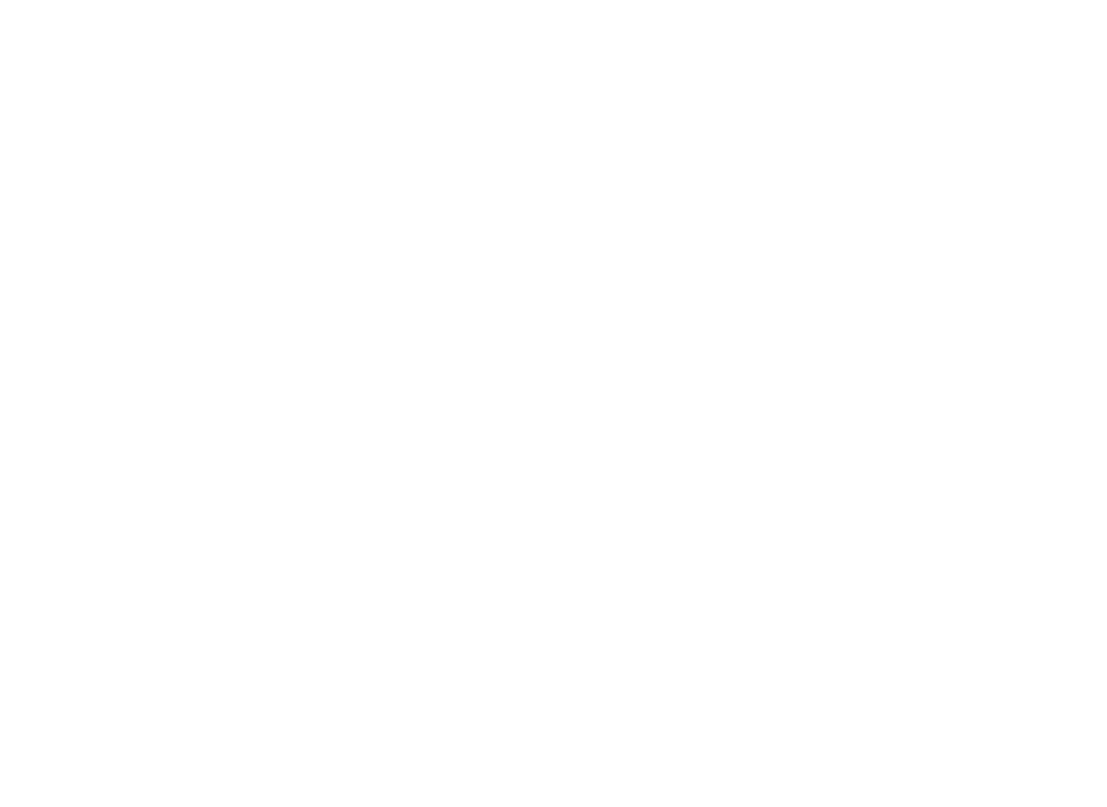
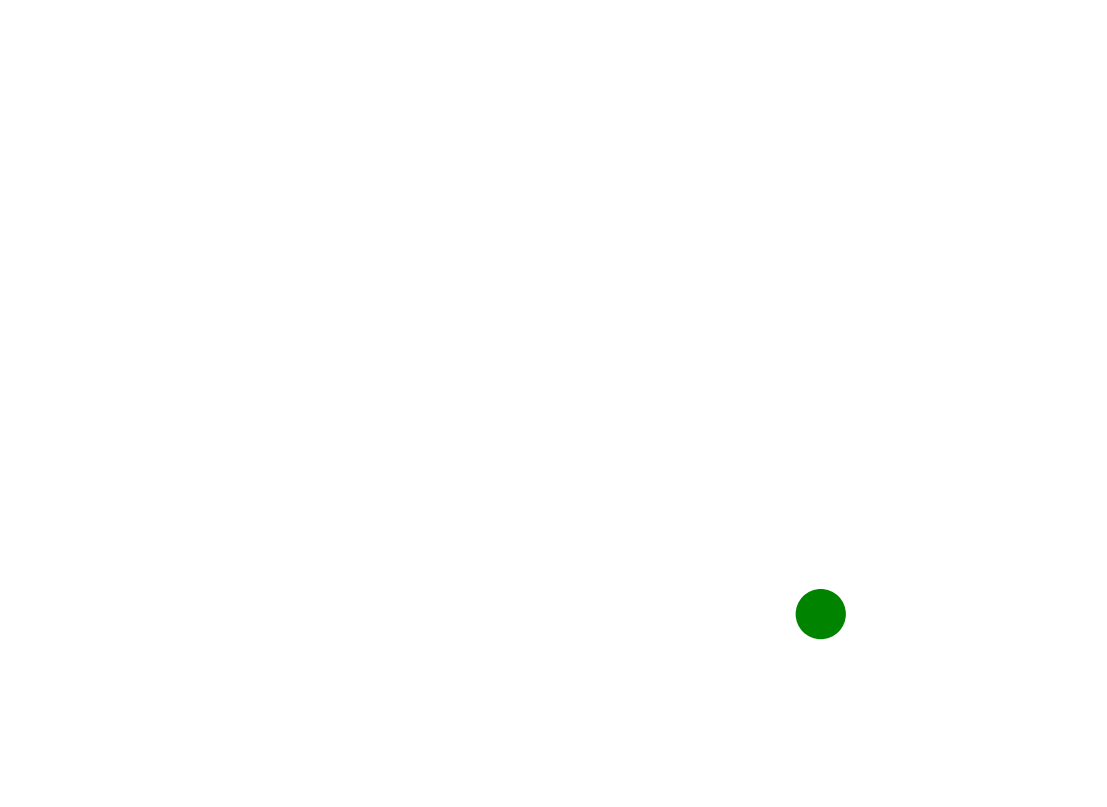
junction: none -> (820, 614)

